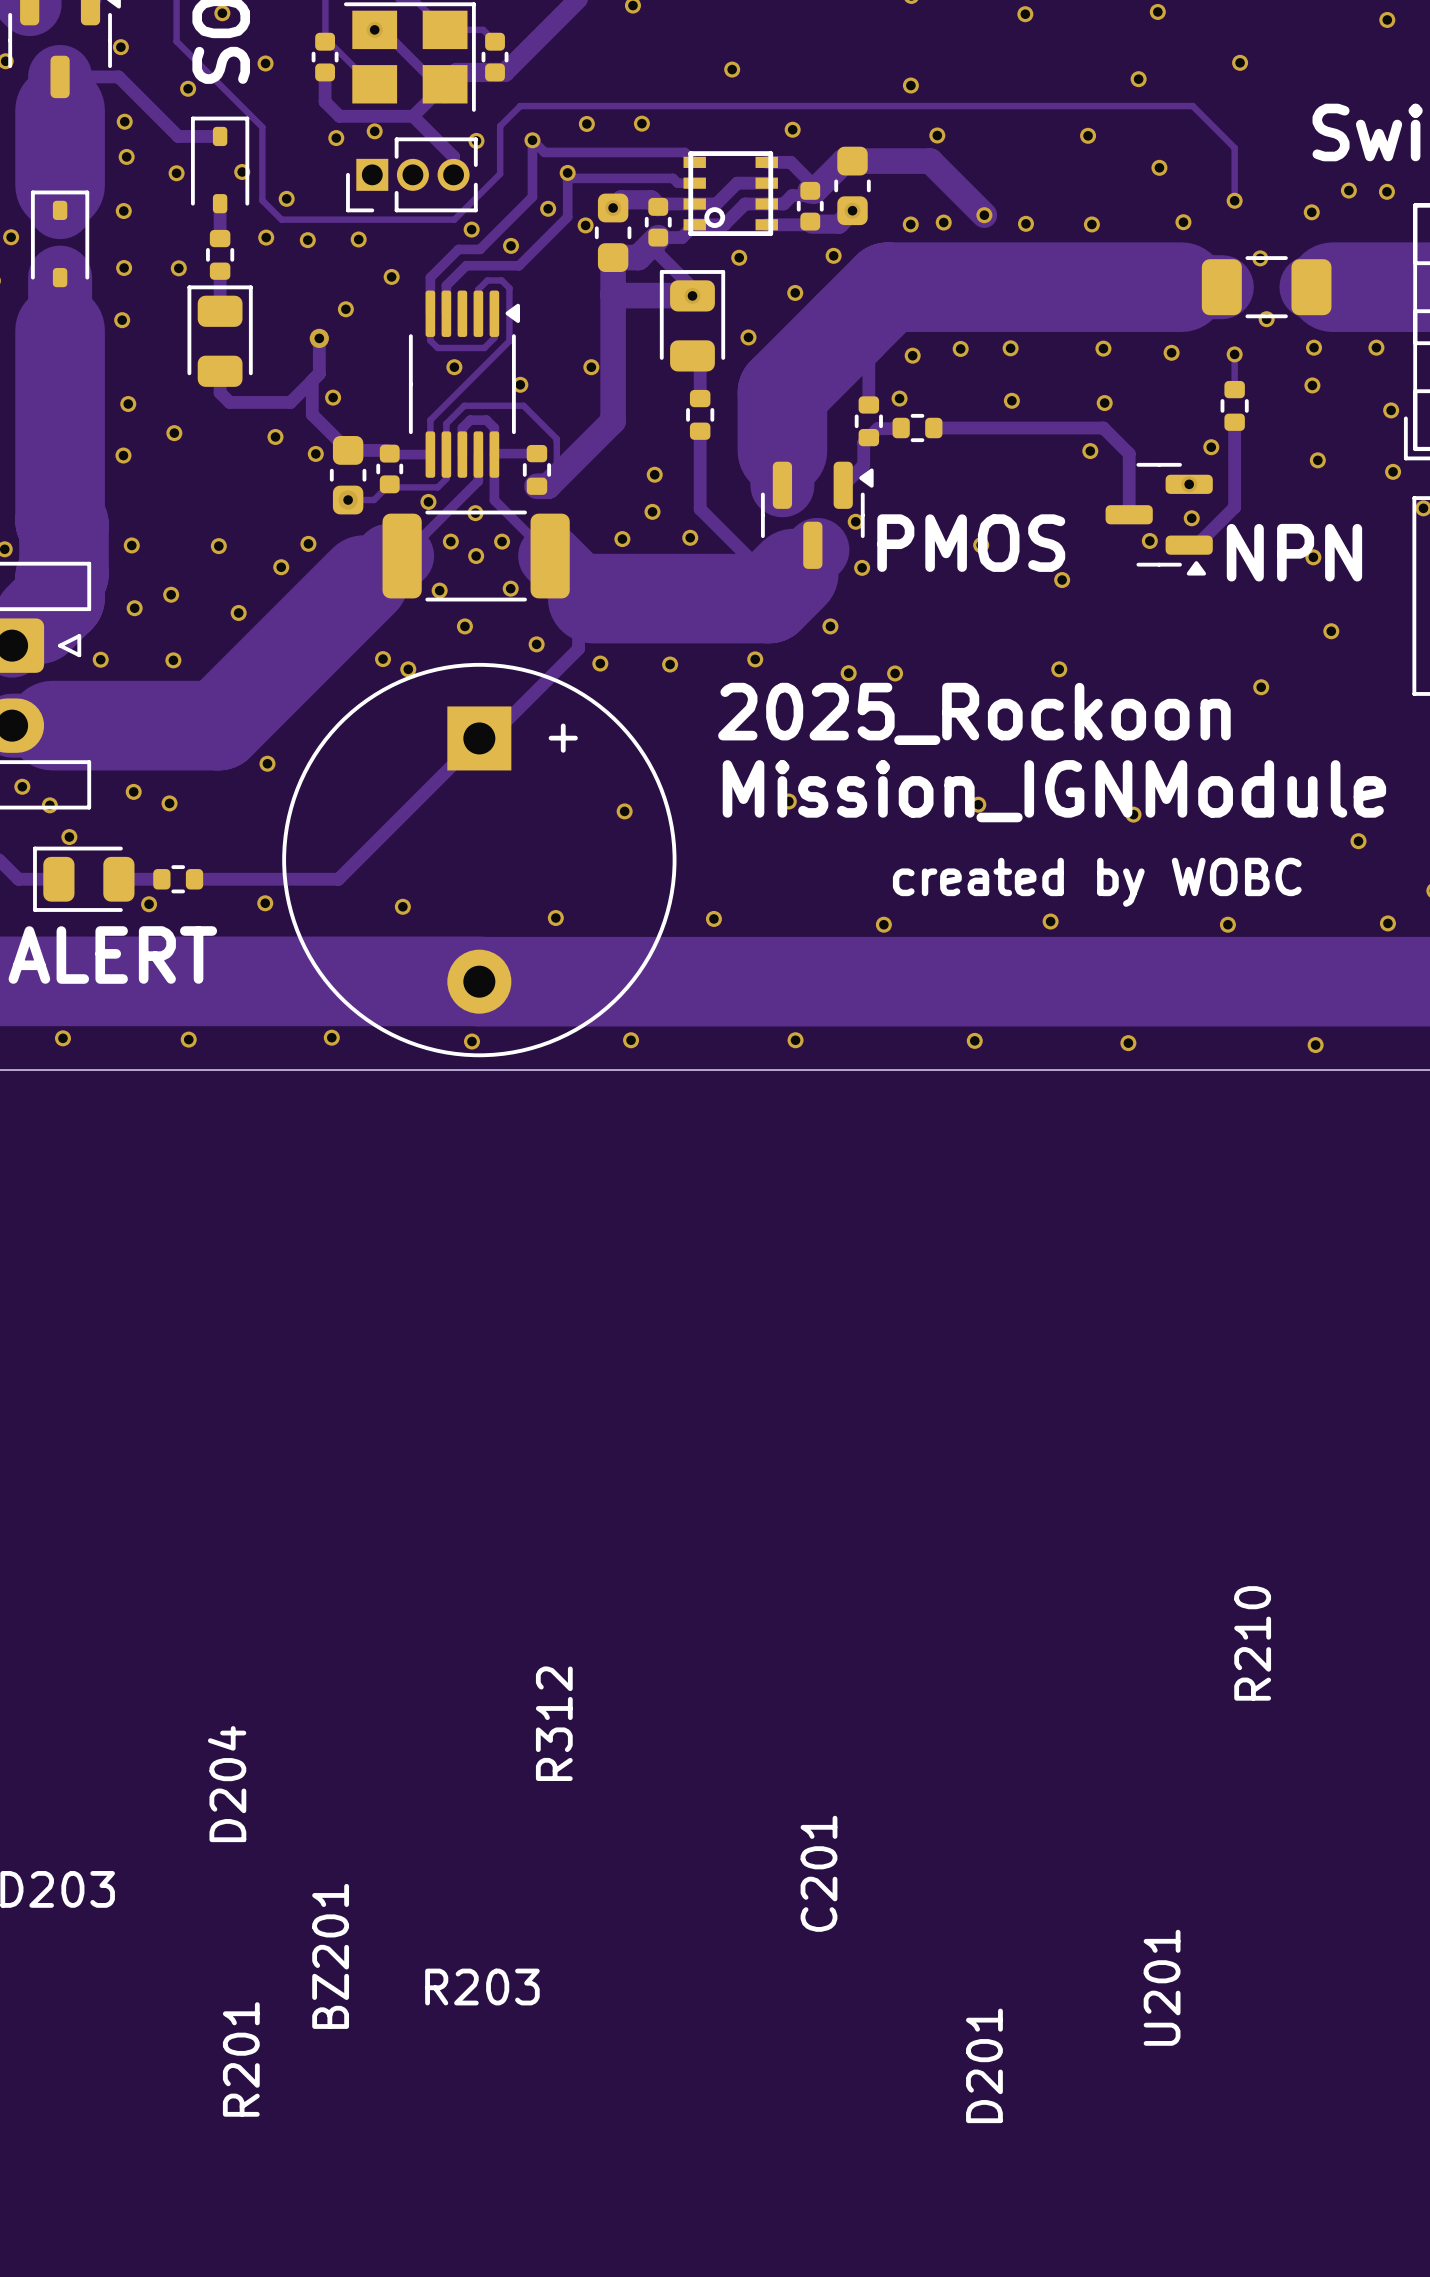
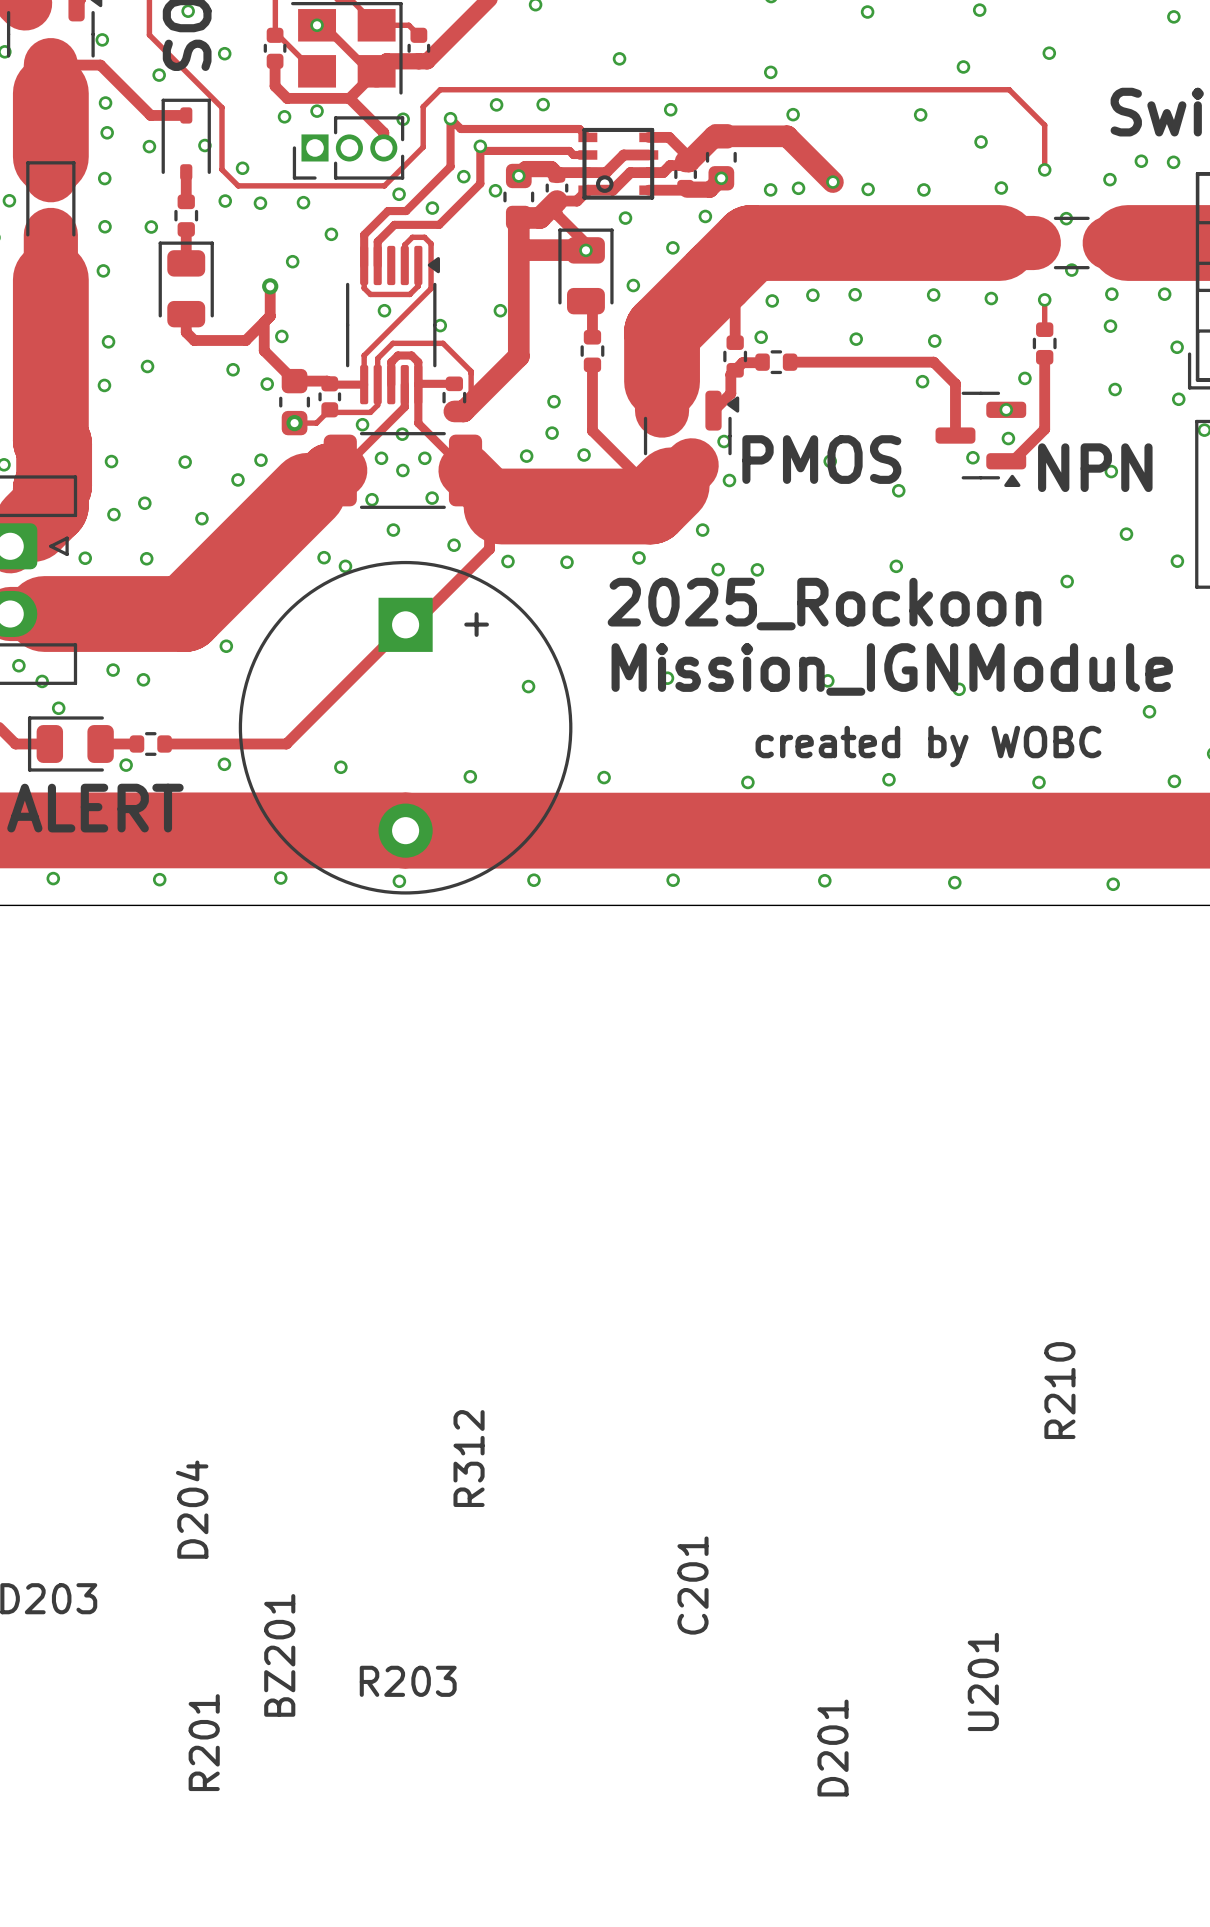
via: none -> (1177, 561)

